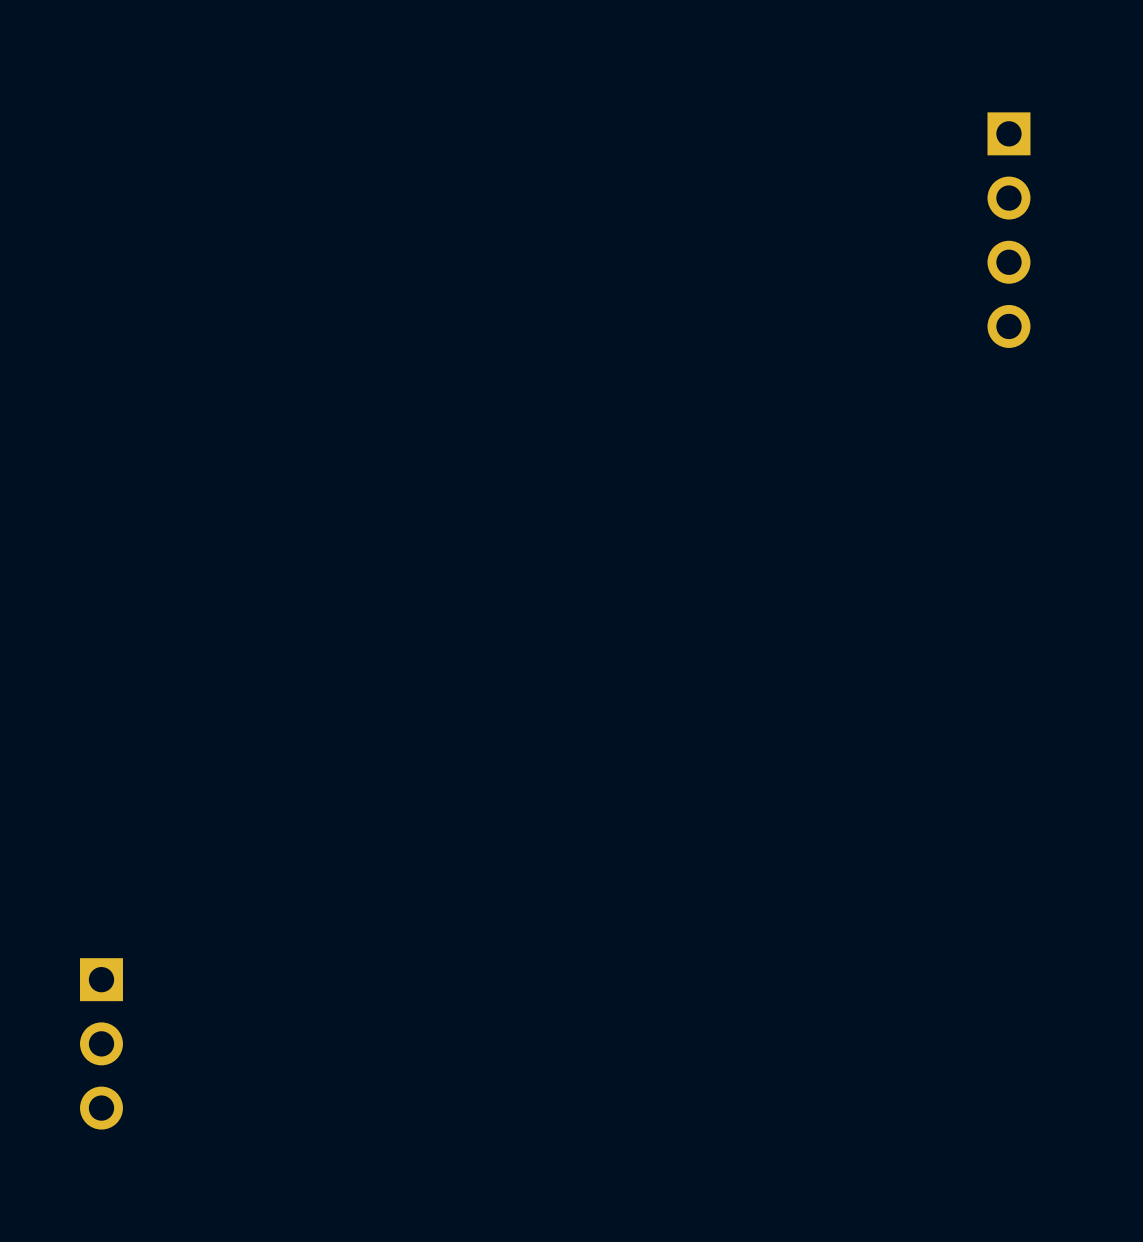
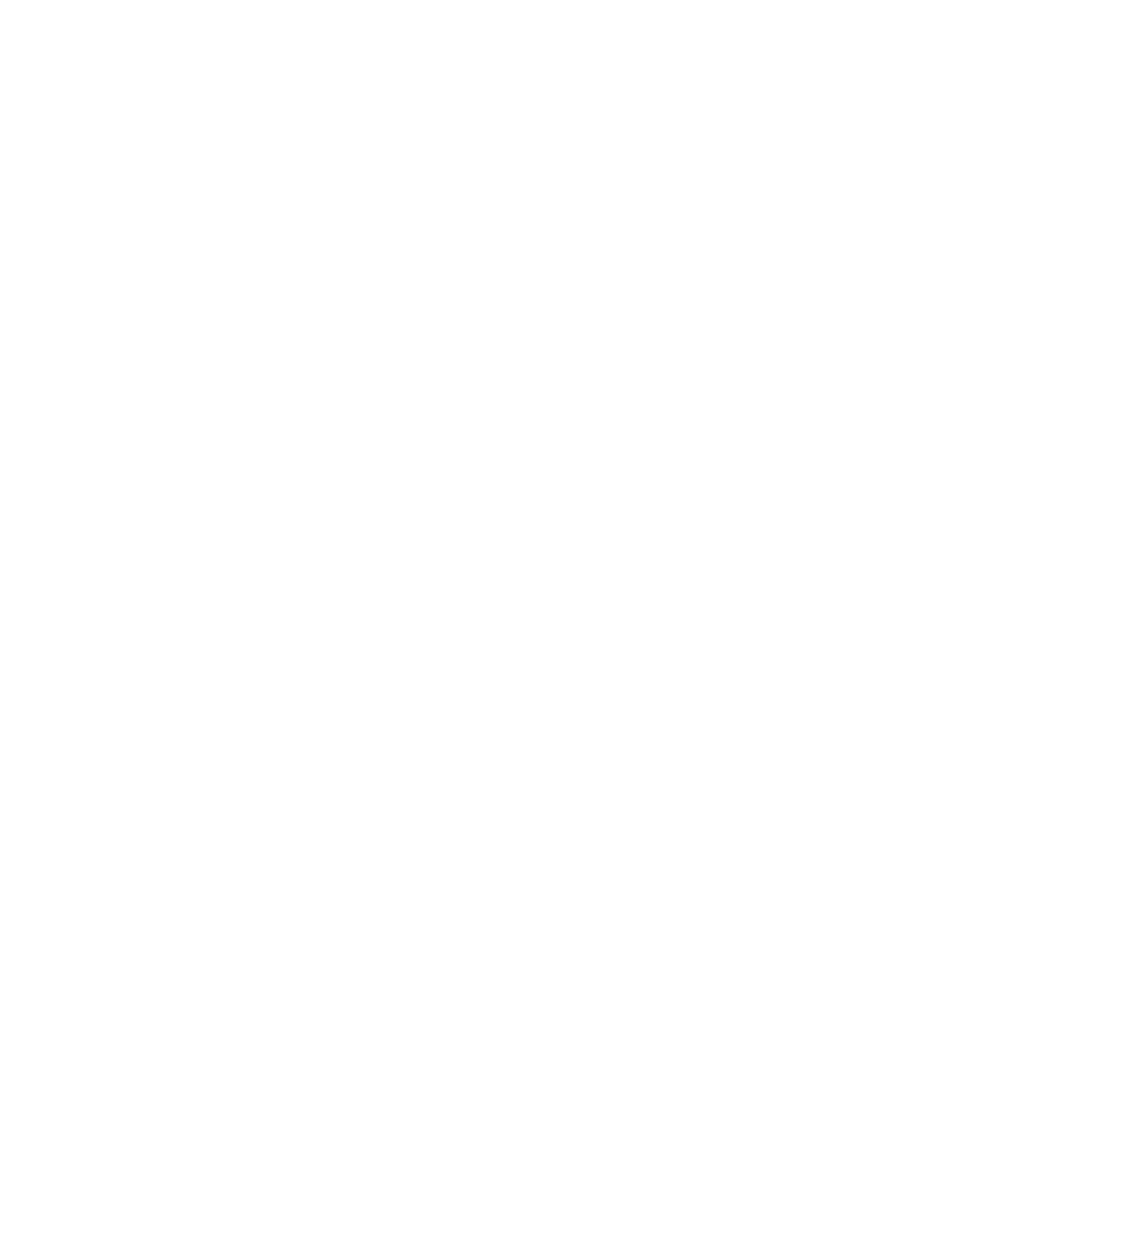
part: (1008, 230) -> none
part: (101, 1043) -> none

